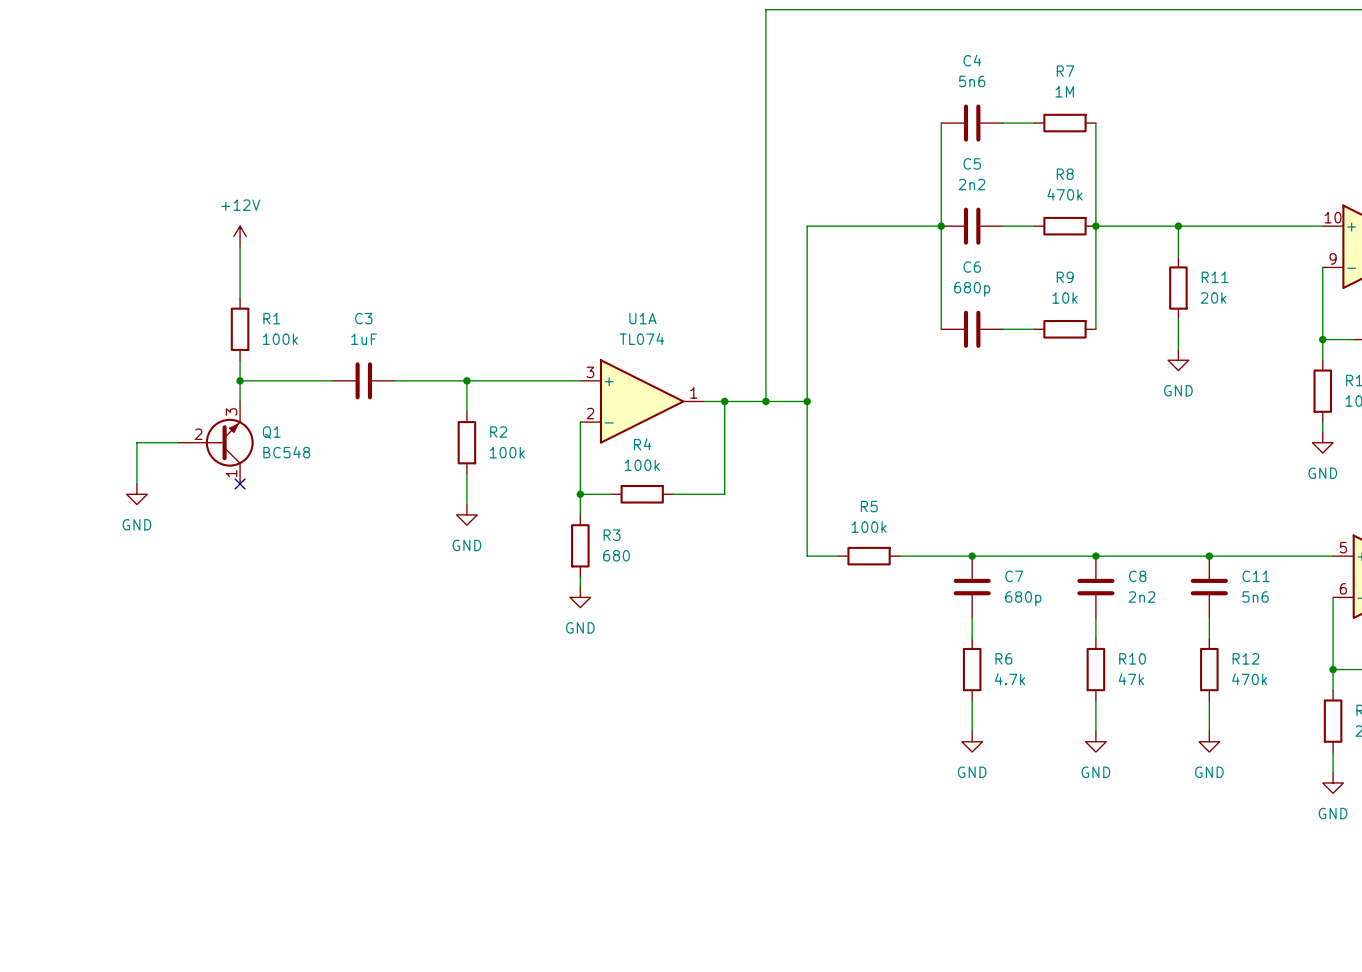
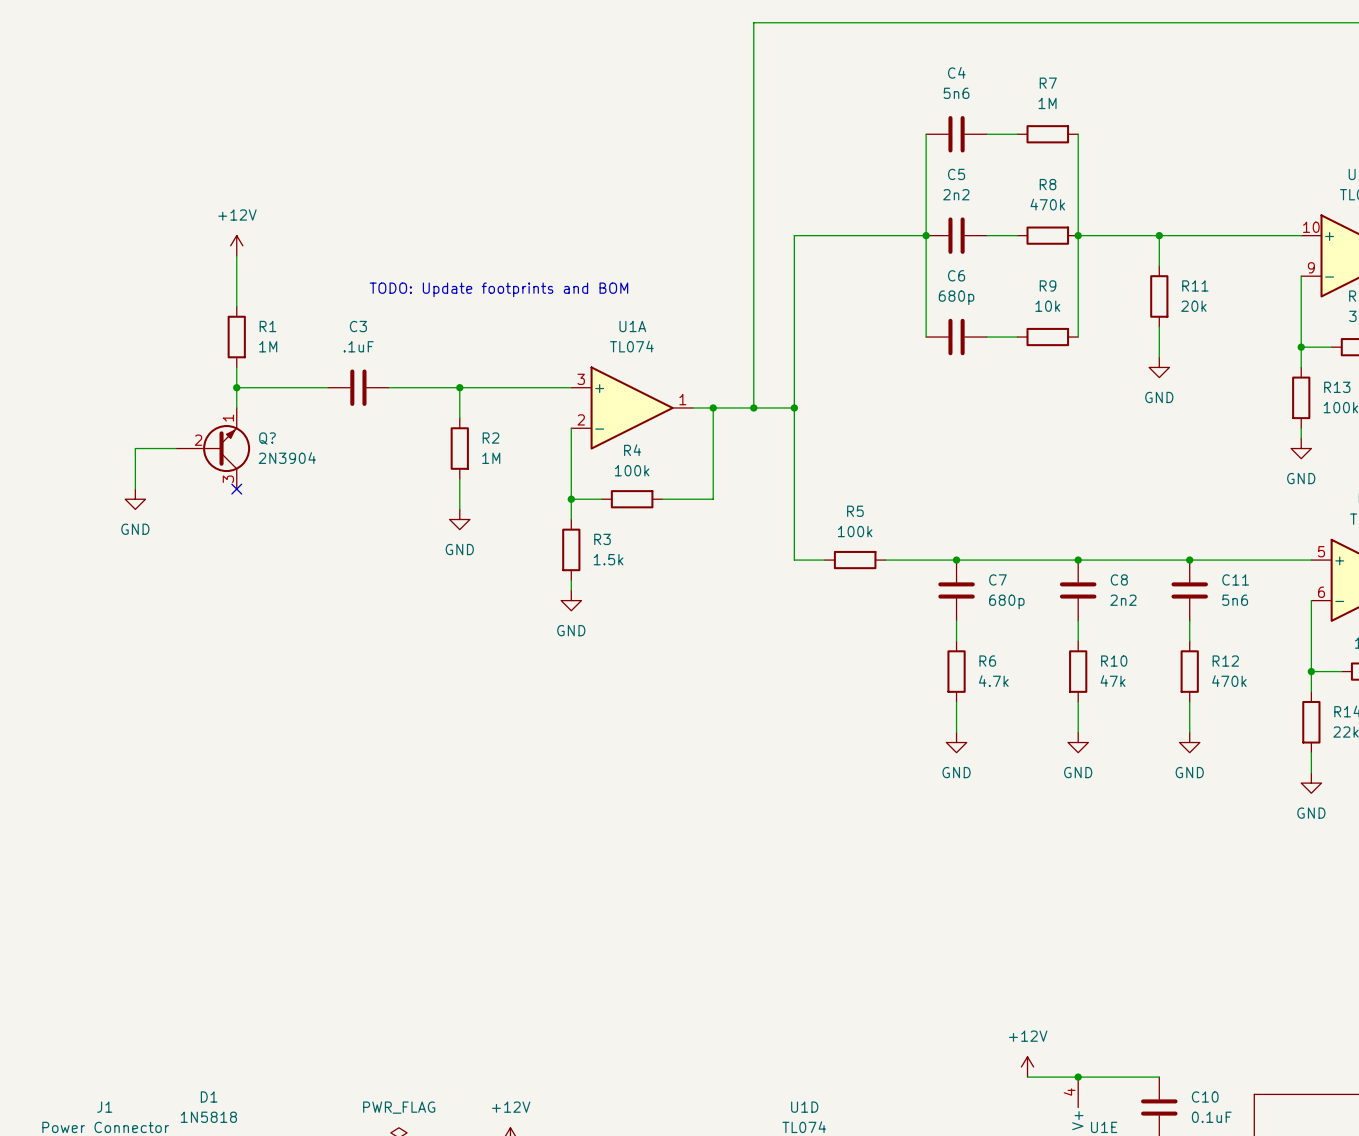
text: none -> TODO: Update footprints and BOM (498, 289)
R1 value: 100k (280, 339) -> 1M (268, 346)
C3 value: 1uF (364, 339) -> .1uF (358, 346)
Q1: BC548 (215, 442) -> none
Q?: none -> 2N3904 (213, 448)
R2 value: 100k (507, 452) -> 1M (491, 458)
R3 value: 680 (616, 555) -> 1.5k (608, 559)

